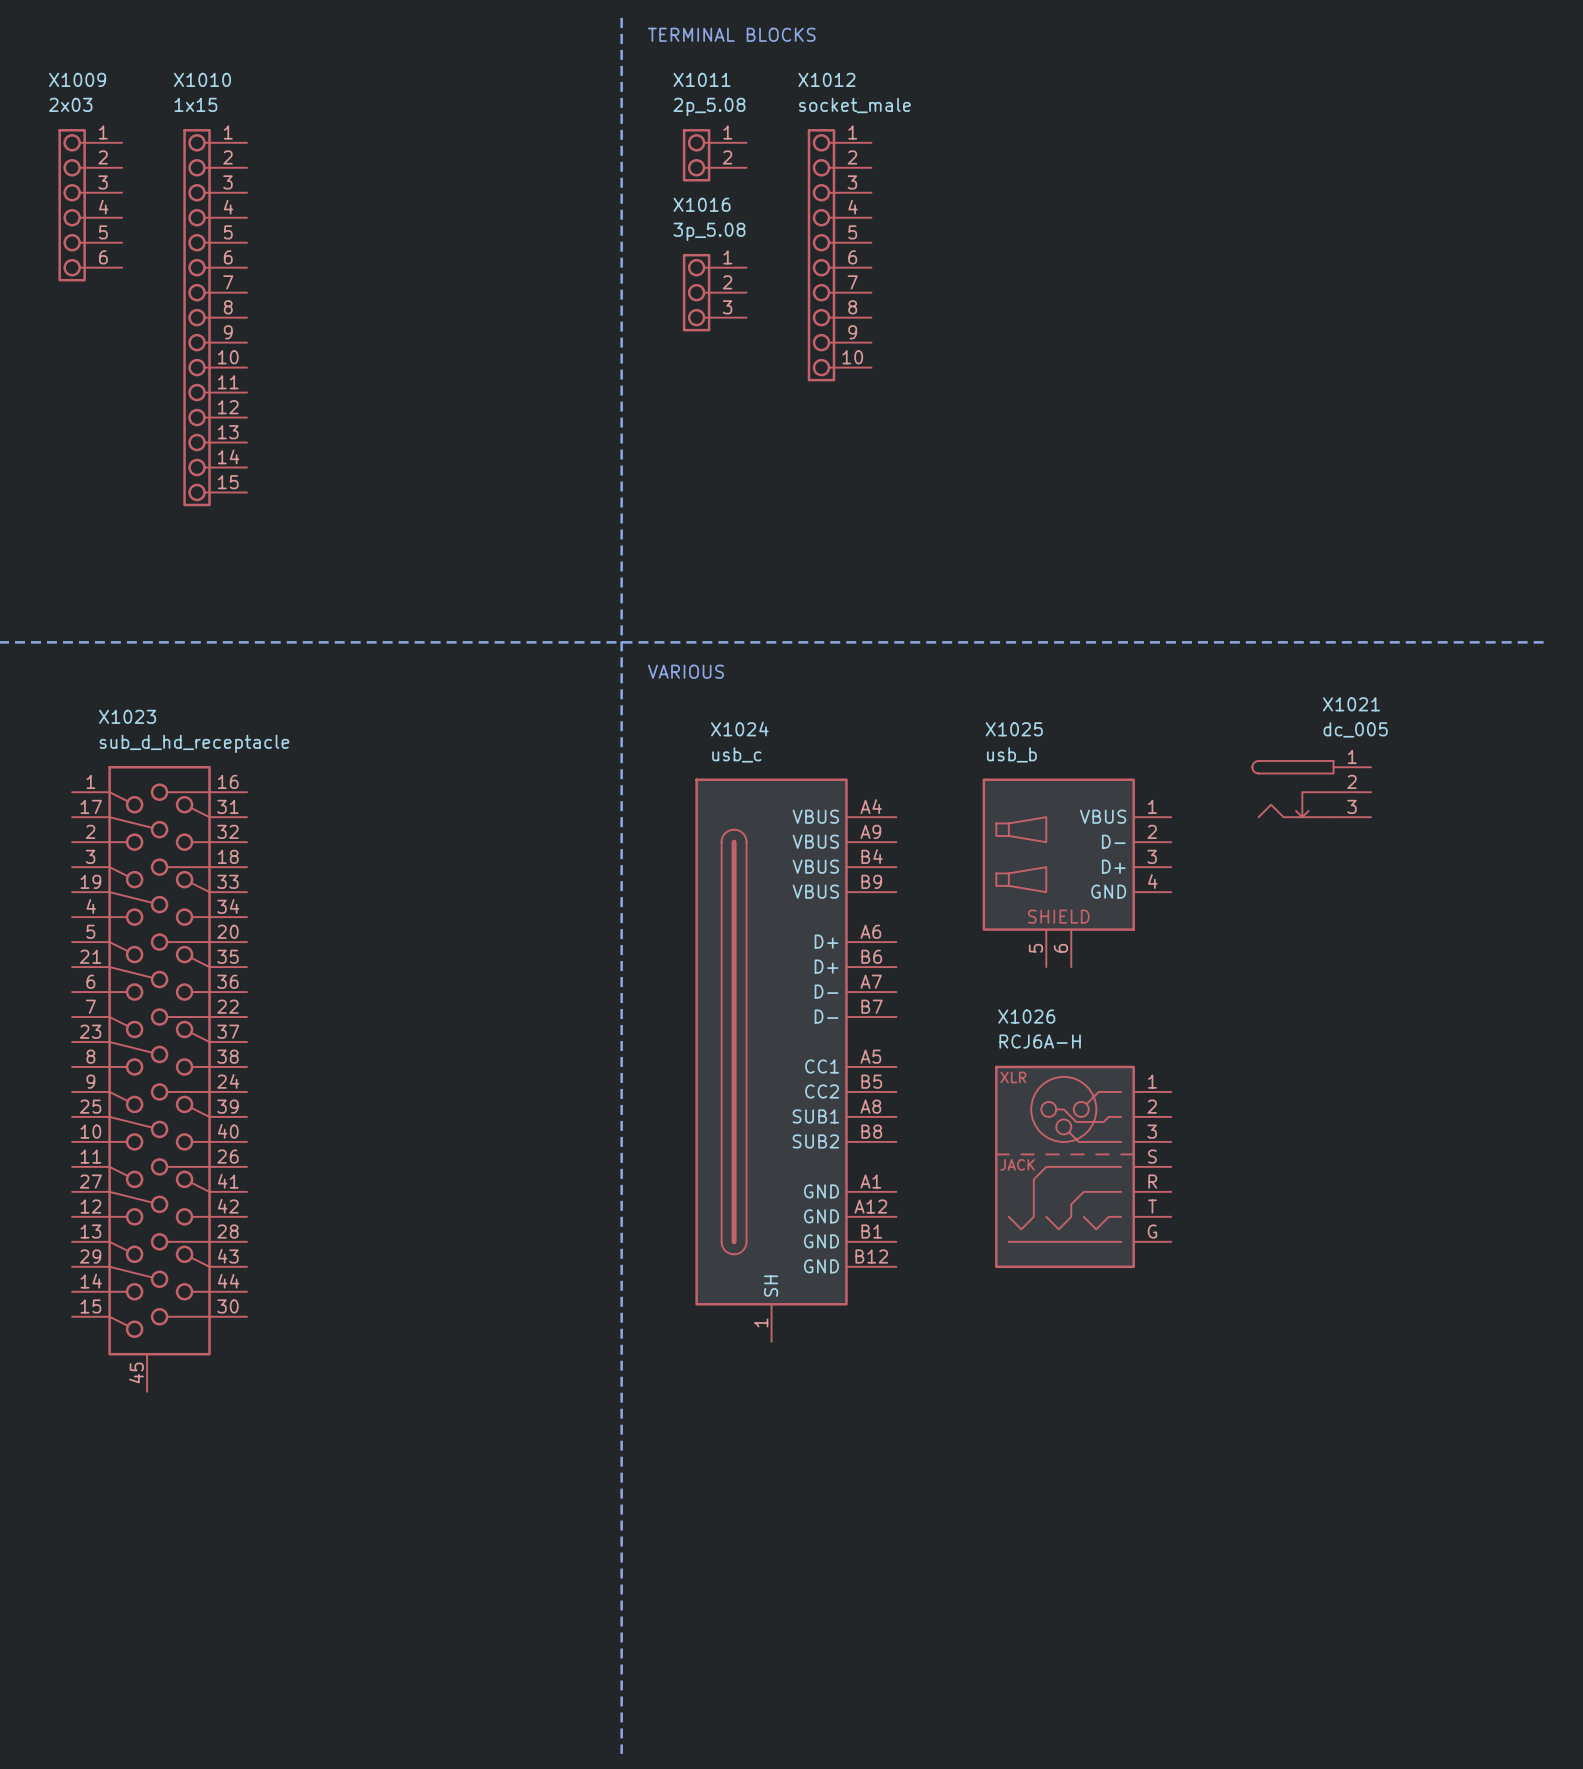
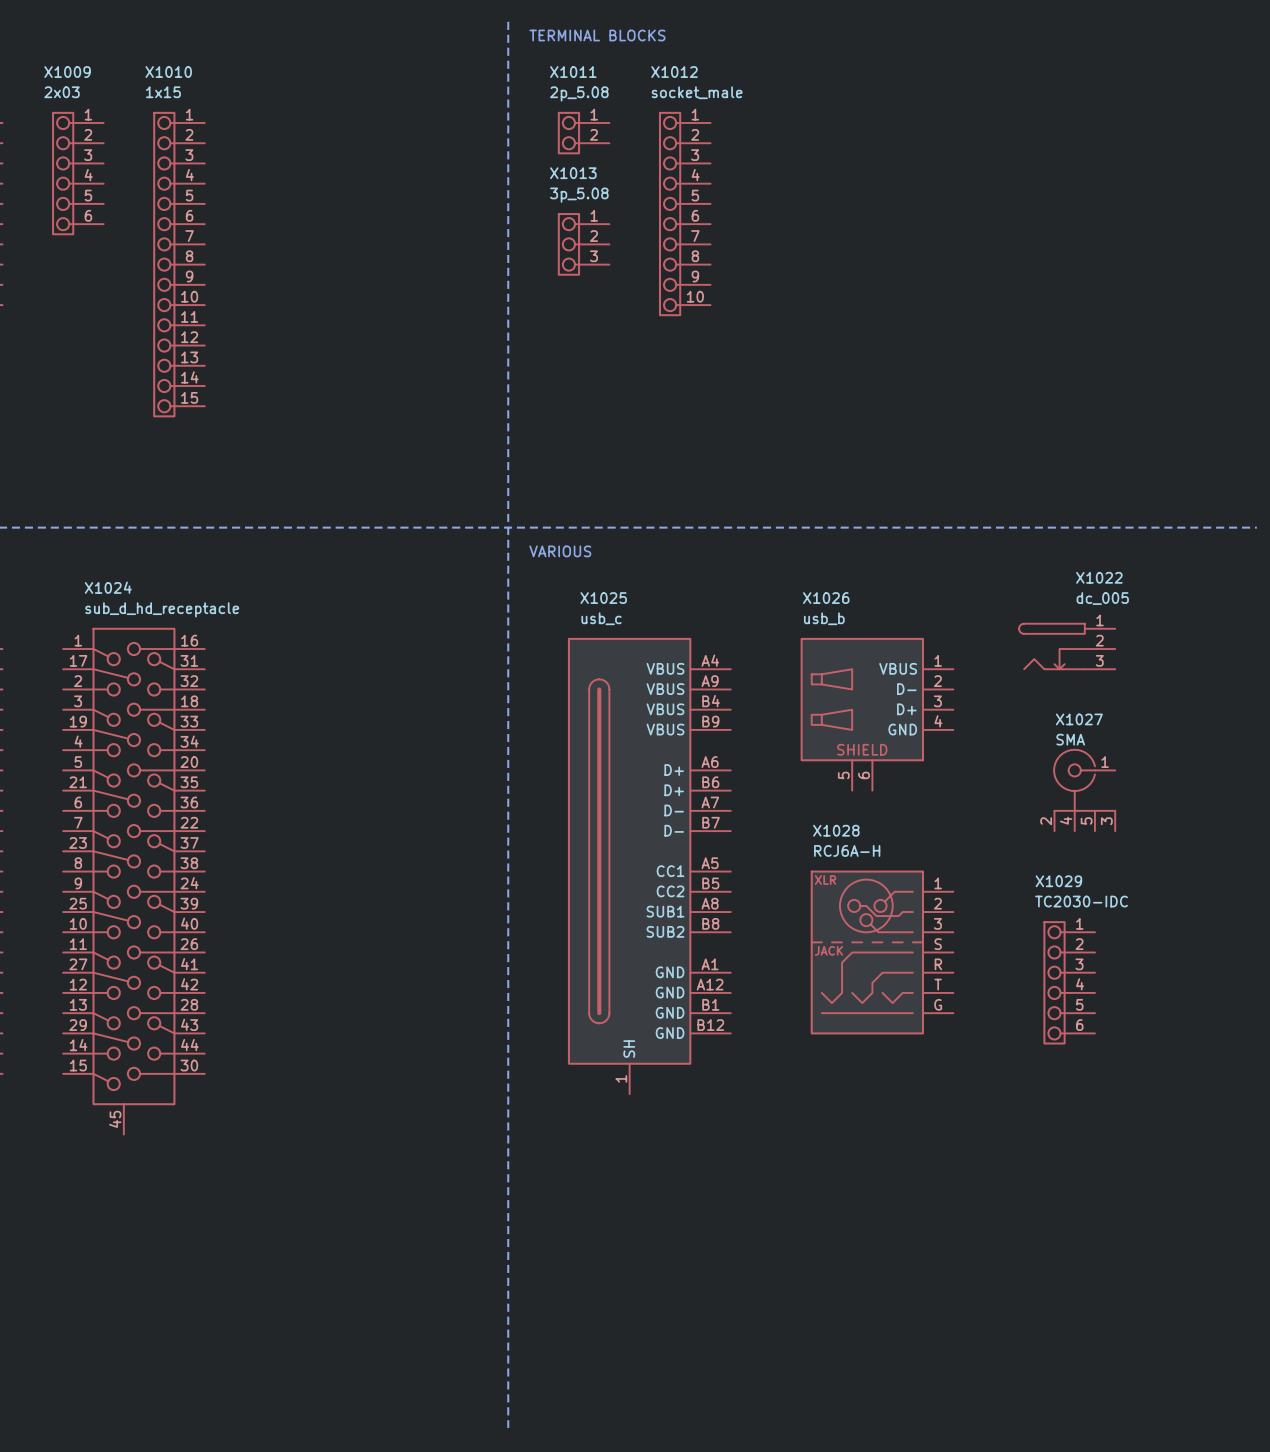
X1016 name: X1016 (702, 204) -> X1013 (573, 173)
X1021 name: X1021 (1351, 704) -> X1022 (1099, 577)
X1023 name: X1023 (127, 716) -> X1024 (108, 587)
X1024 name: X1024 (739, 729) -> X1025 (603, 598)
X1025 name: X1025 (1014, 729) -> X1026 (826, 598)
X1027: none -> SMA (1084, 790)
X1026 name: X1026 (1026, 1016) -> X1028 (836, 830)
X1029: none -> TC2030-IDC (1069, 982)

